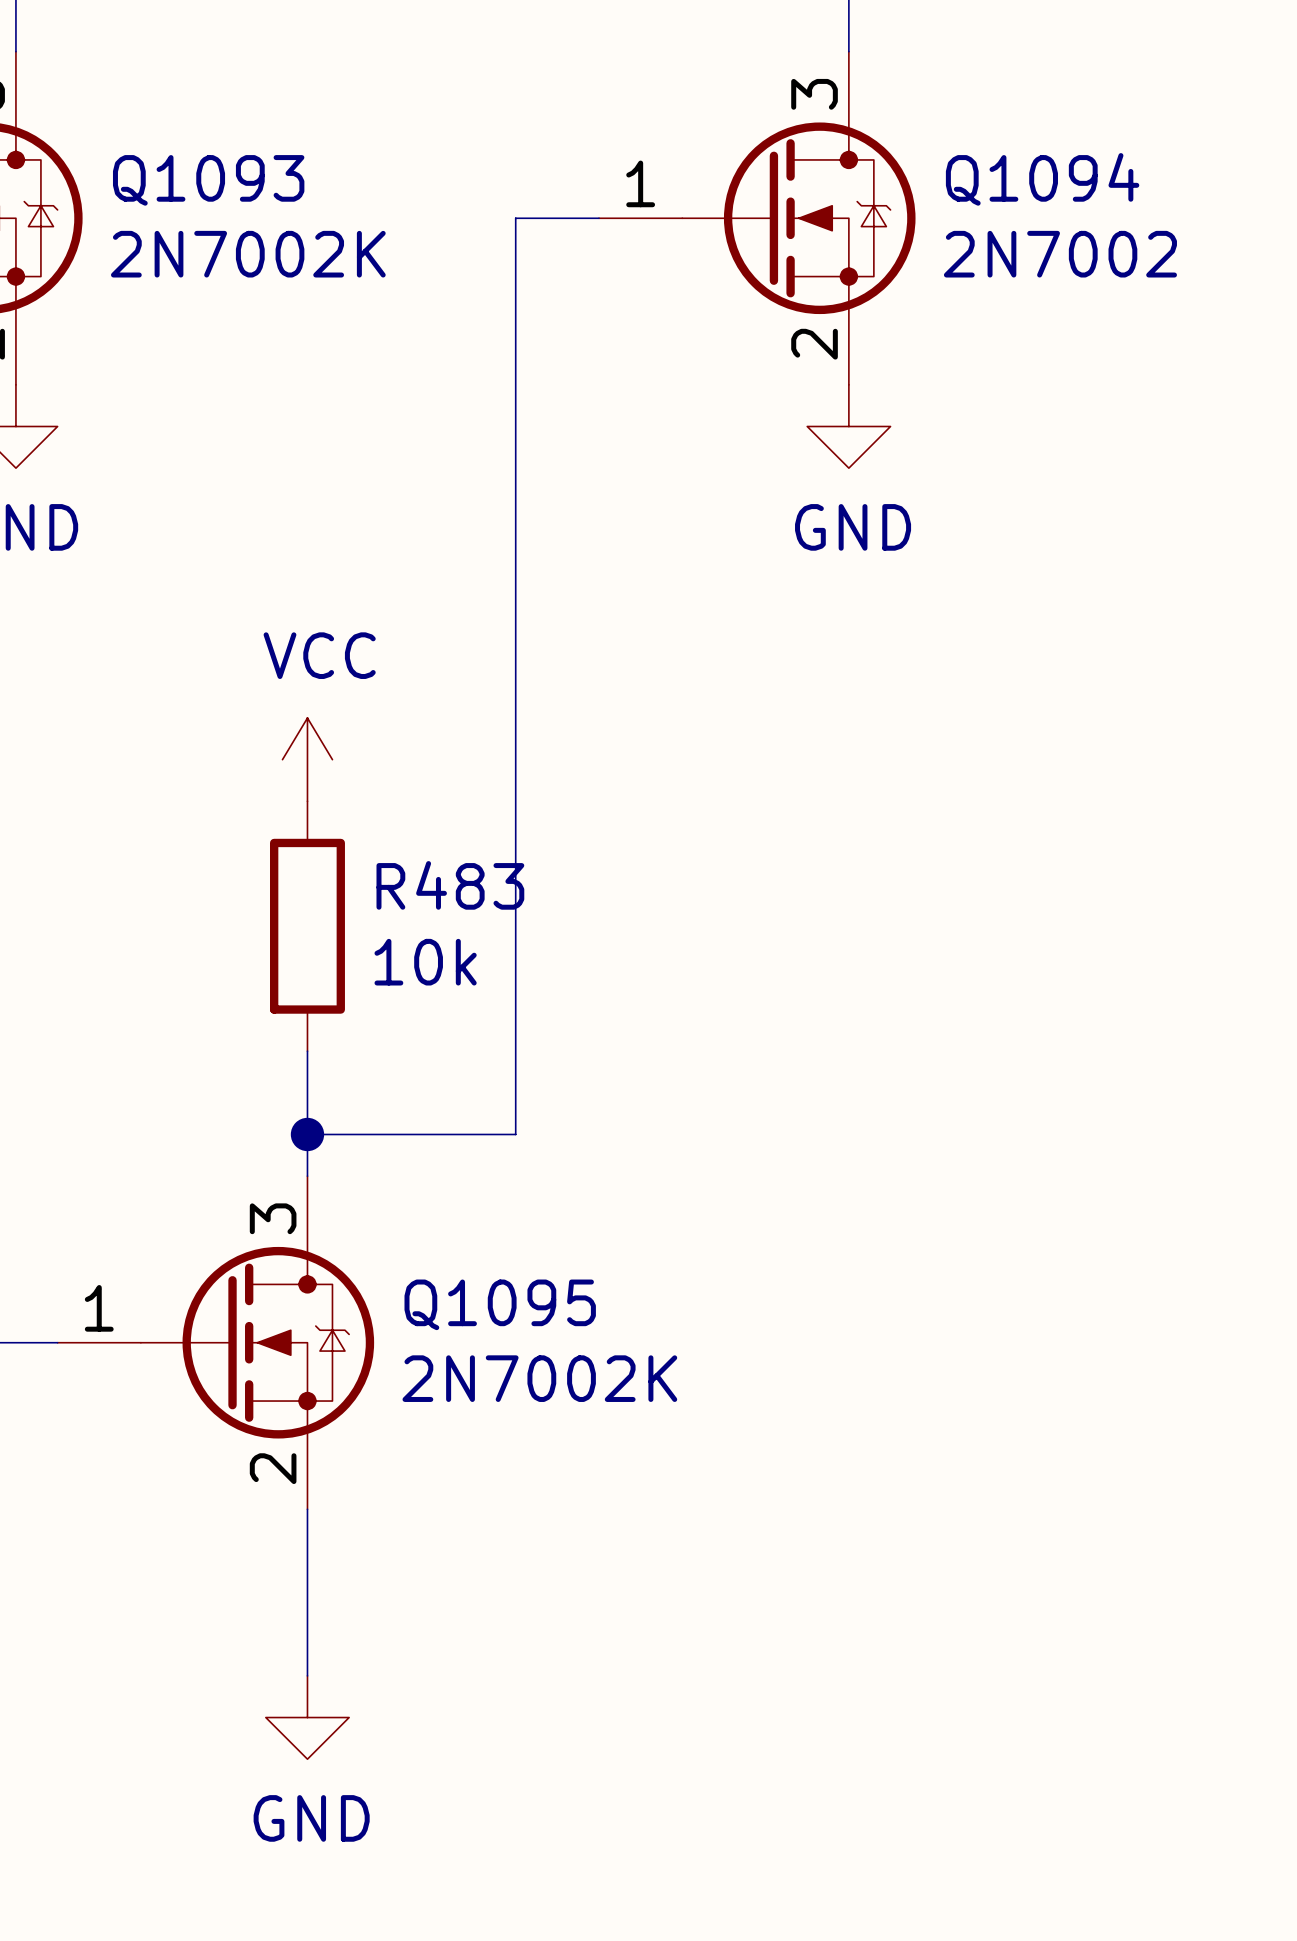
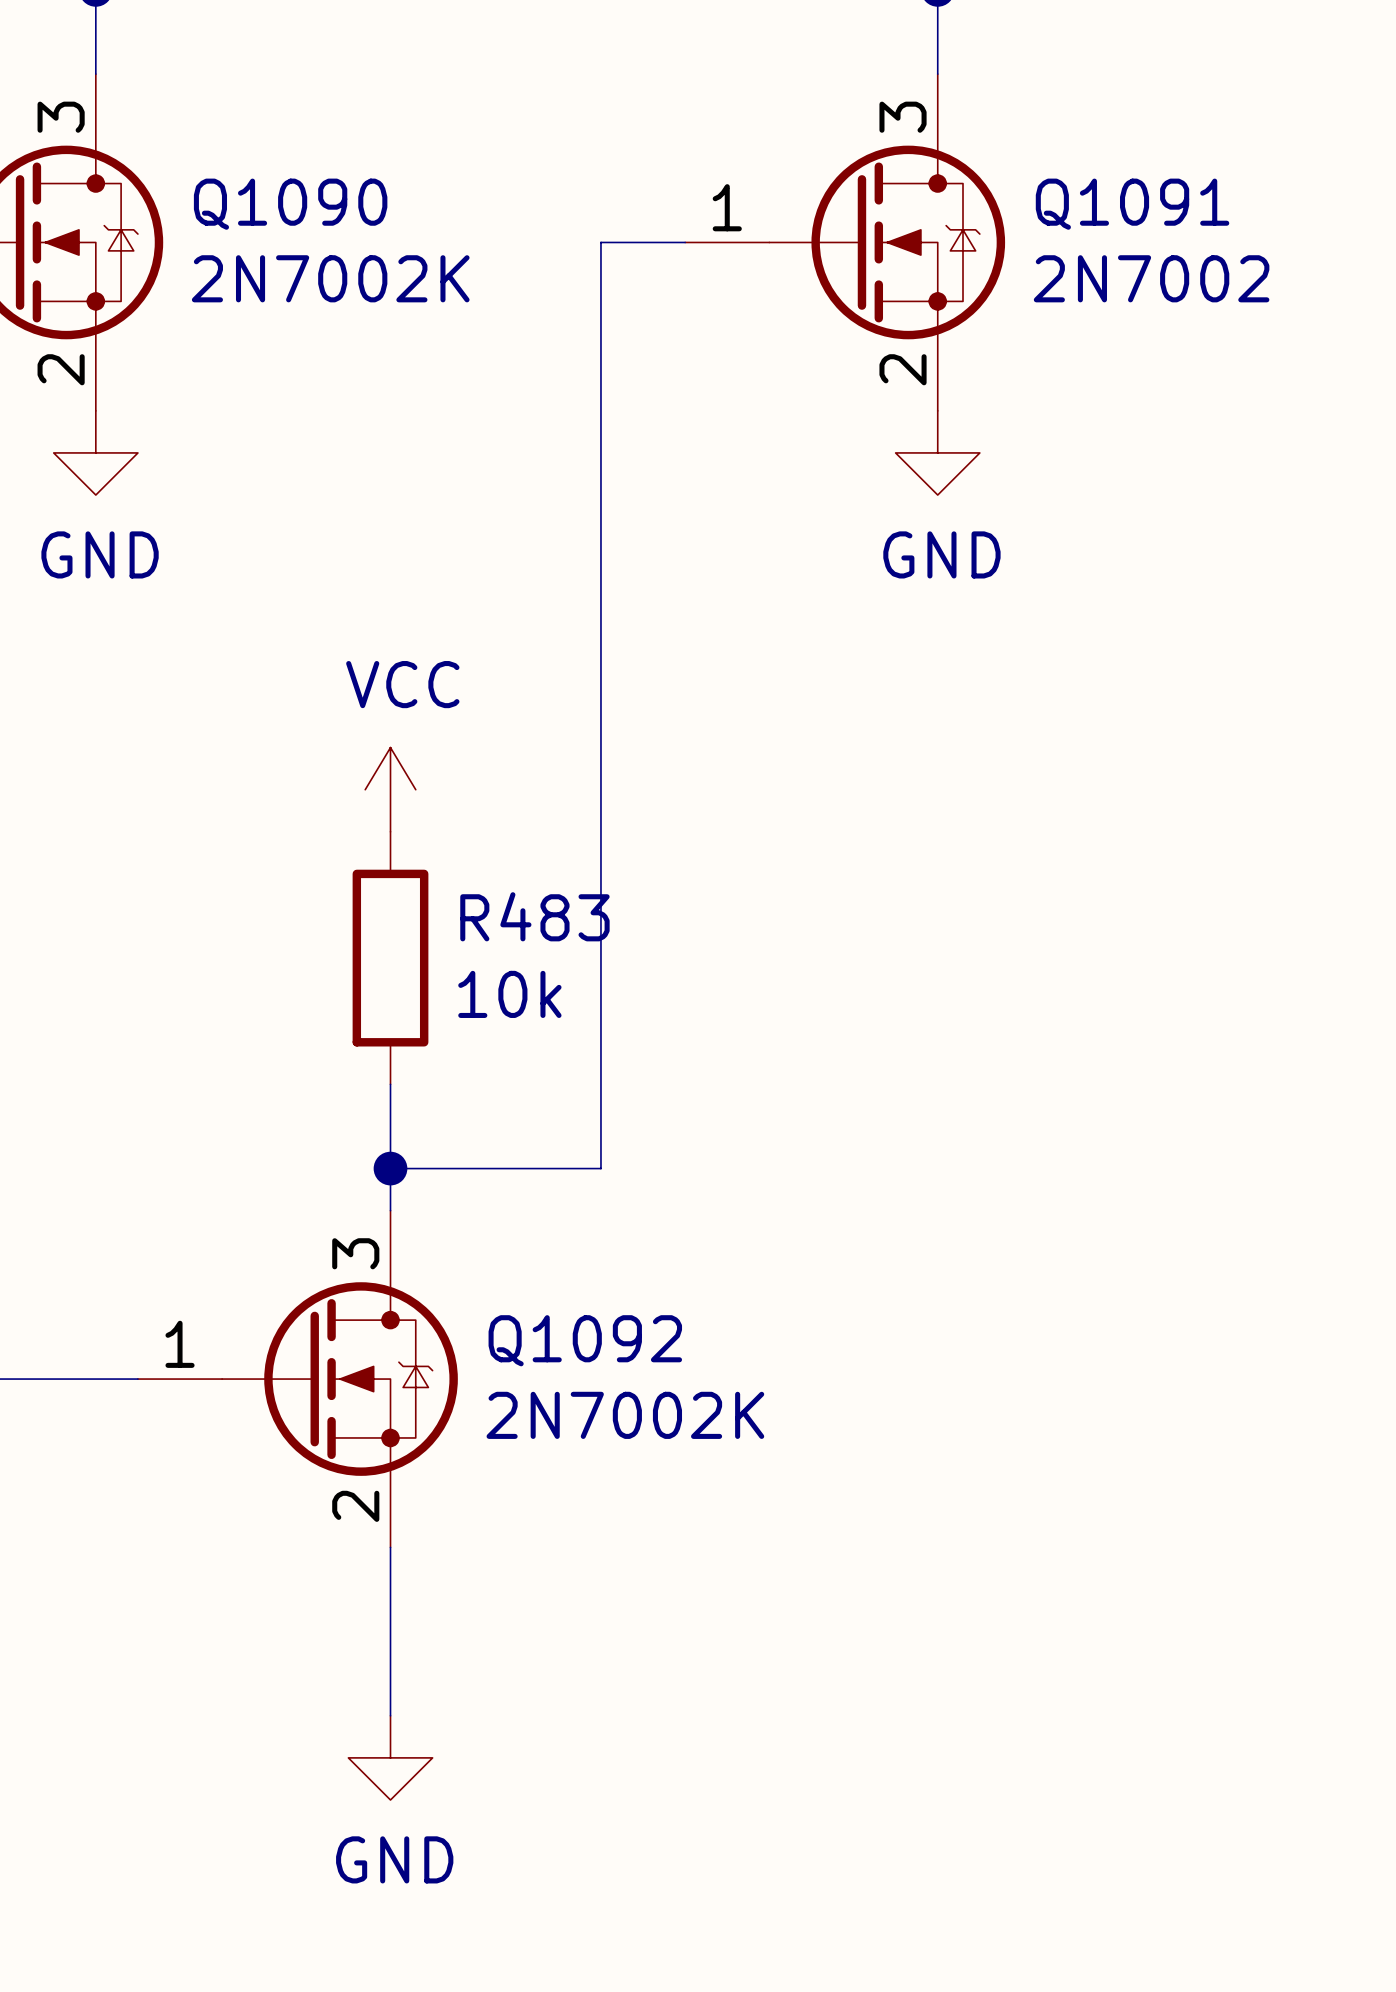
Q1094 name: Q1094 (1042, 179) -> Q1091 (1132, 204)
Q1093 name: Q1093 (208, 180) -> Q1090 (290, 204)
Q1095 name: Q1095 (500, 1304) -> Q1092 (585, 1340)

